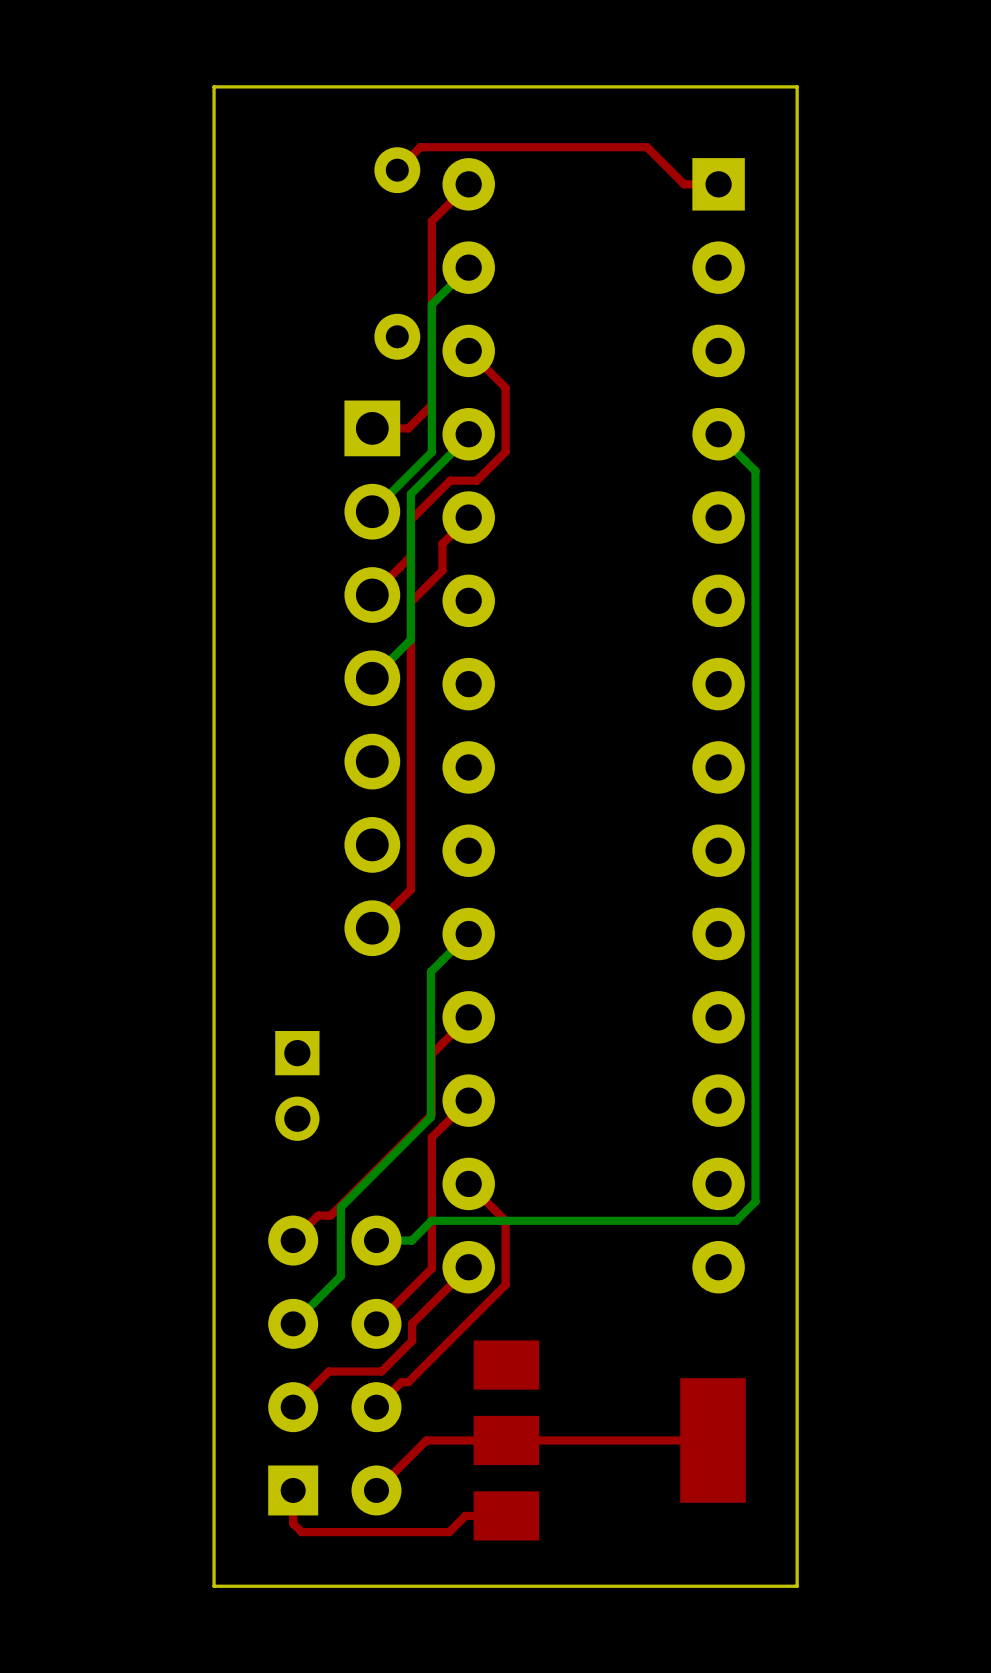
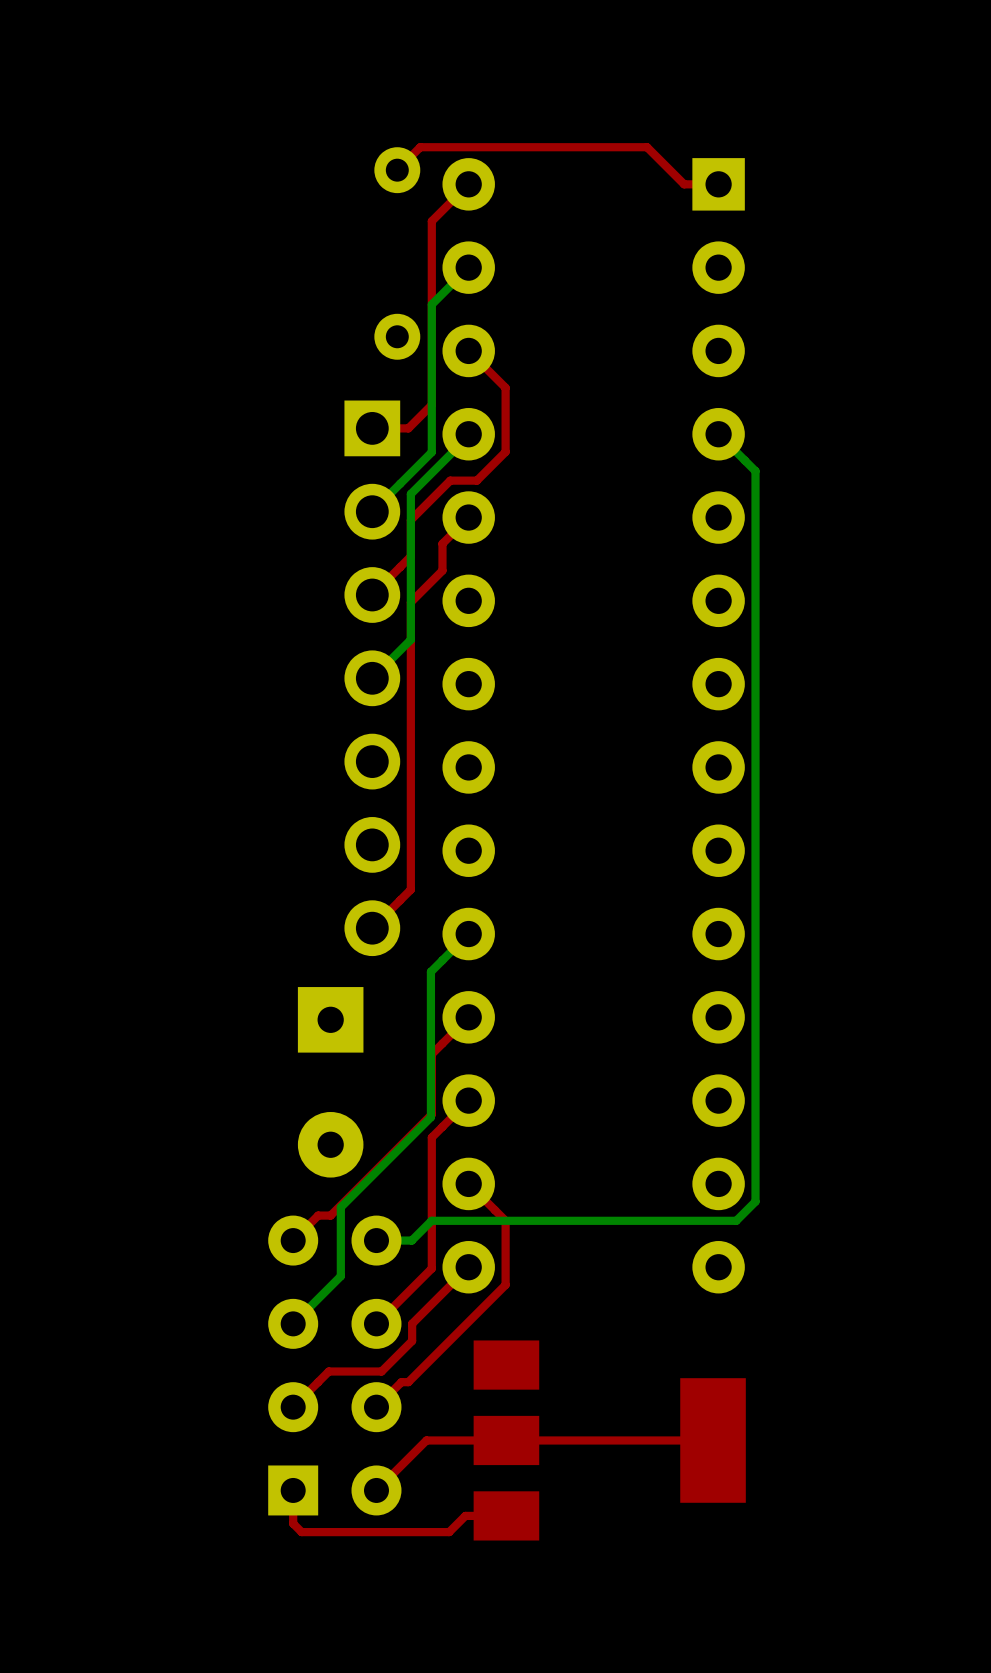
board edge: (797, 86) (214, 86) (214, 1586) (797, 1586) (797, 86) -> none
part: none -> (330, 1082)
part: (297, 1085) -> none

